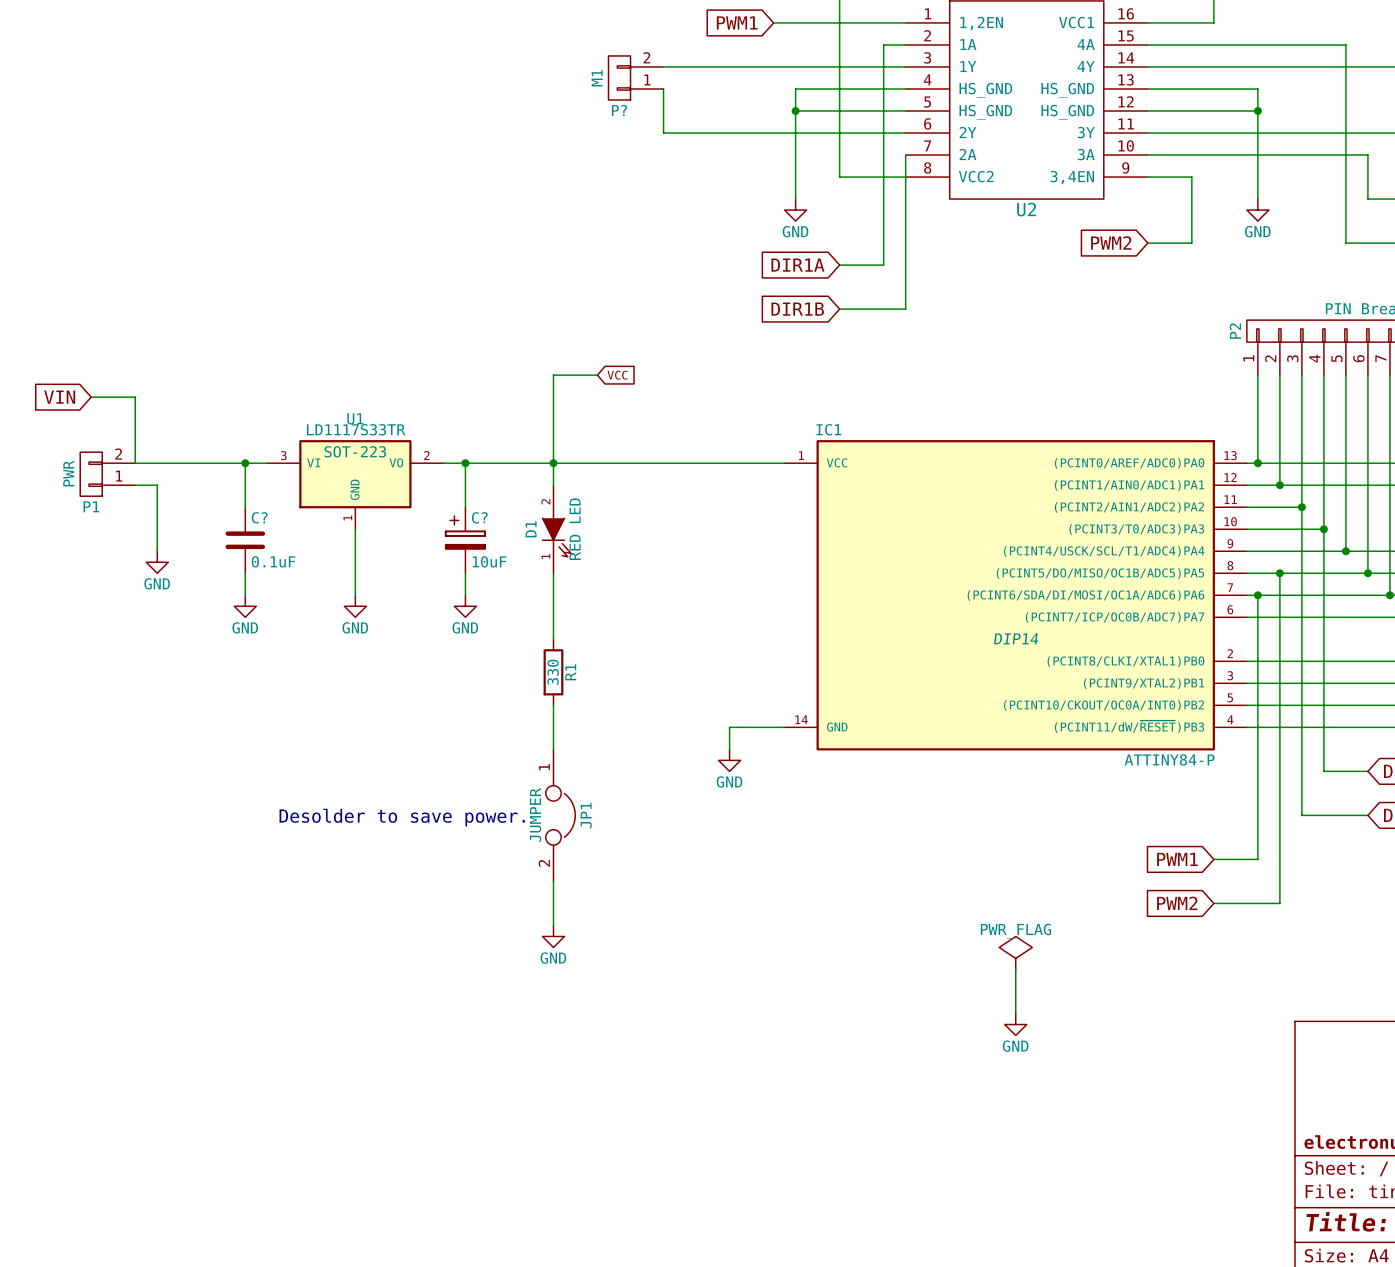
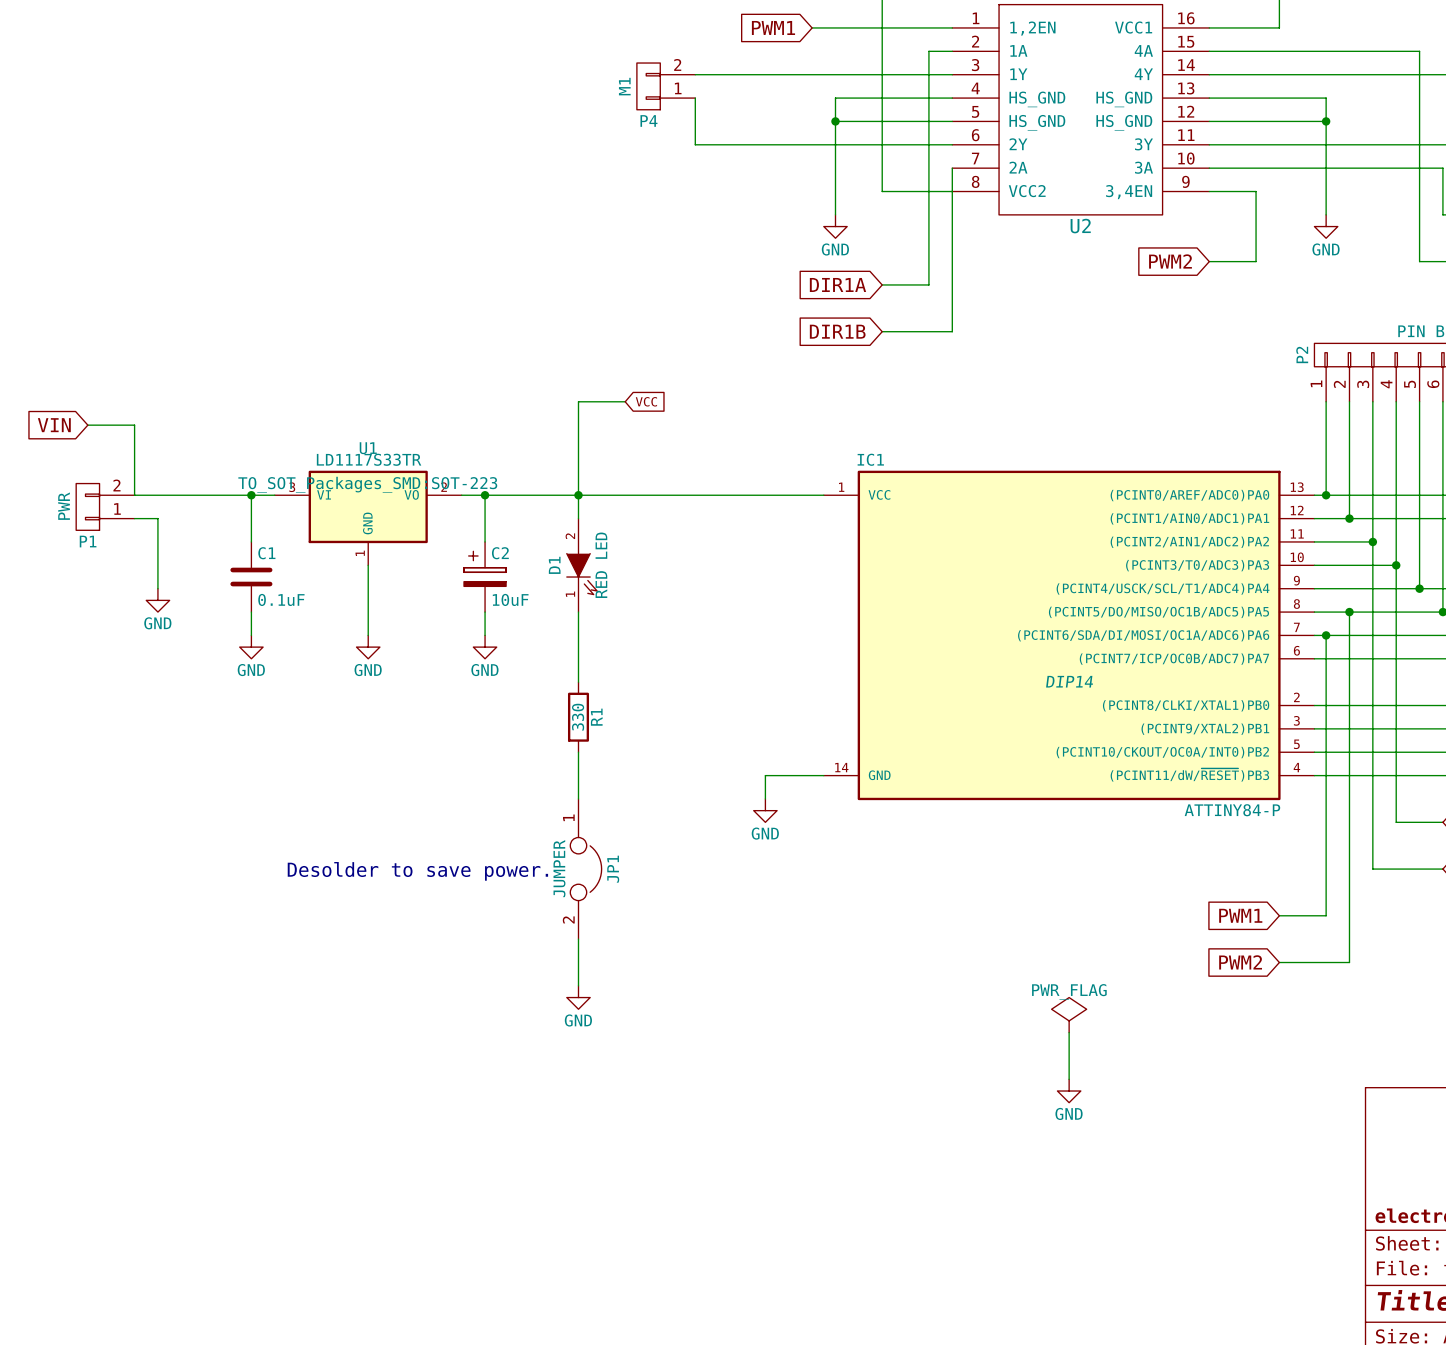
P? name: P? (619, 110) -> P4 (648, 120)
U1 text: SOT-223 (355, 451) -> TO_SOT_Packages_SMD:SOT-223 (367, 484)
C? name: C? (259, 517) -> C1 (266, 553)
C? name: C? (479, 517) -> C2 (500, 553)

